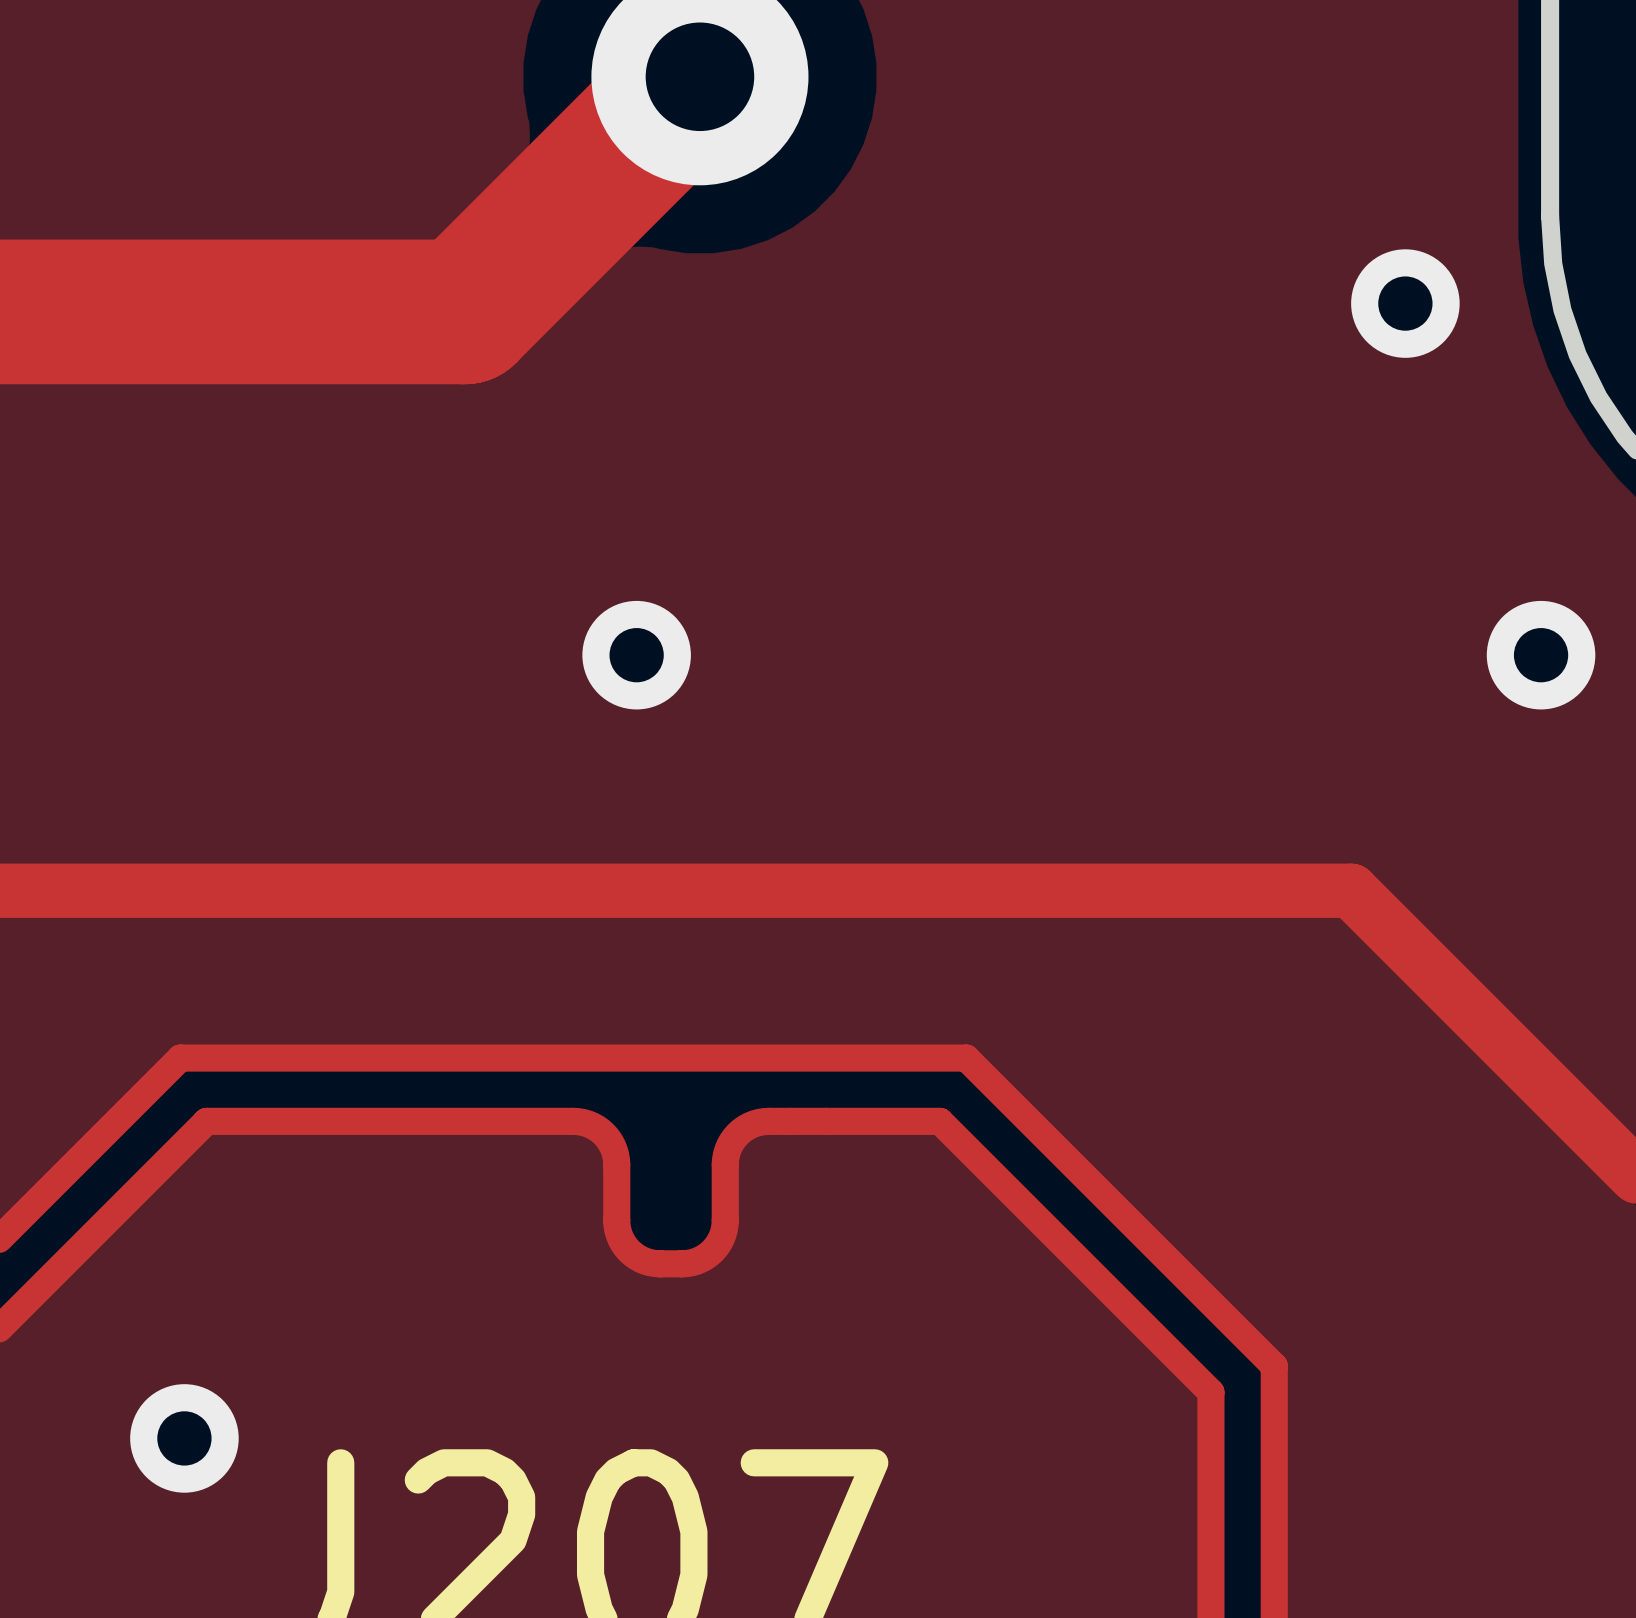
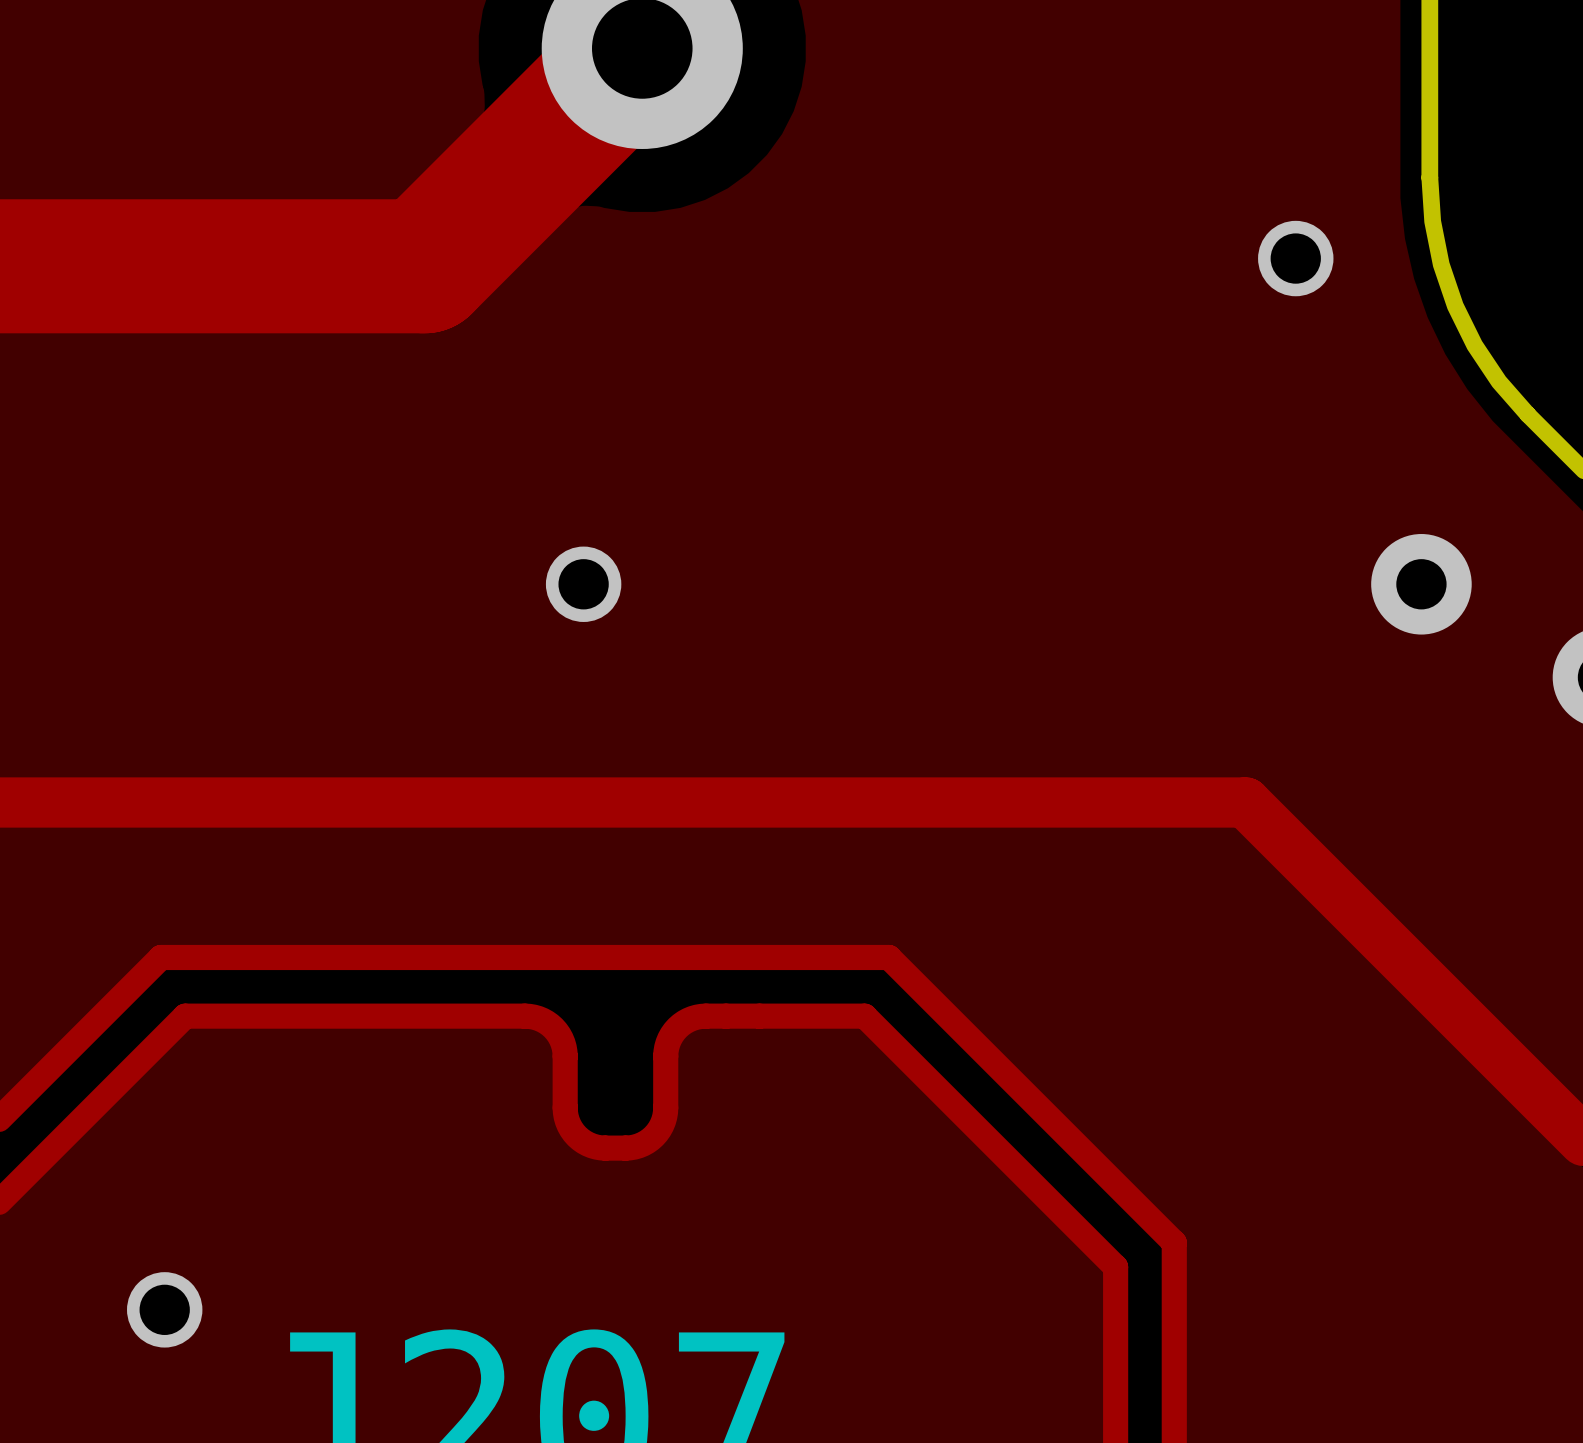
via size: [1351, 249, 1460, 358] -> [1258, 220, 1334, 297]
via size: [582, 600, 691, 710] -> [545, 546, 622, 622]
via size: [130, 1384, 239, 1493] -> [127, 1272, 203, 1348]

